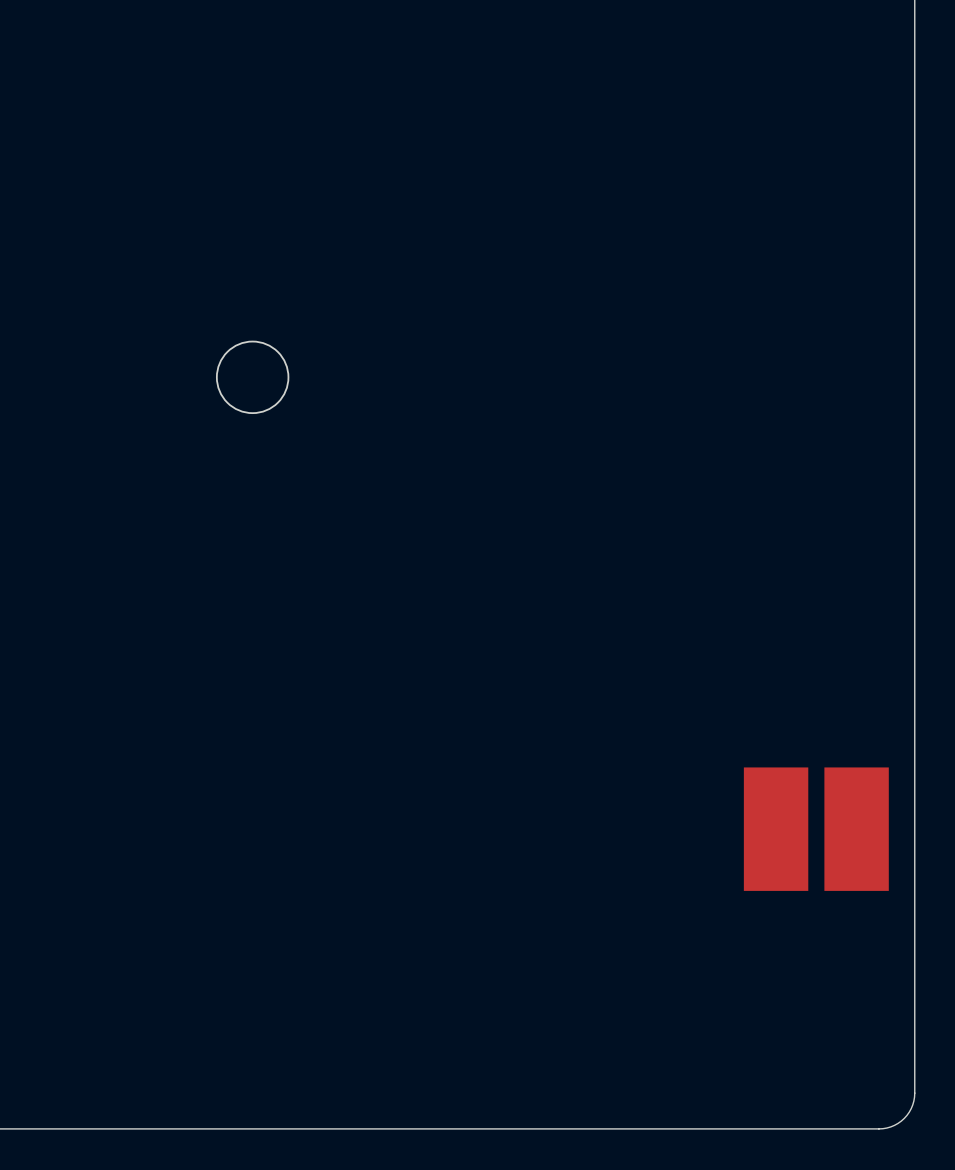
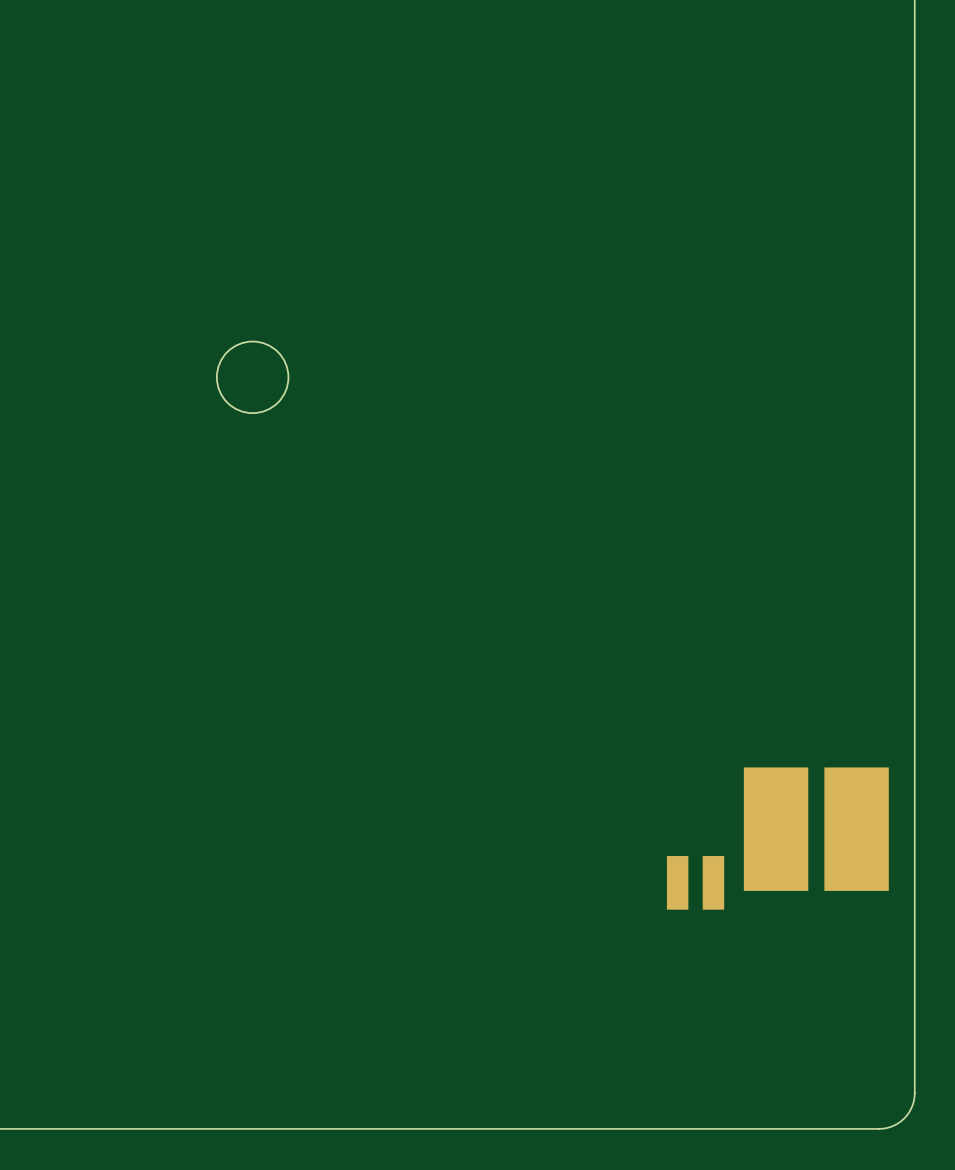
part: none -> (677, 882)
part: none -> (713, 882)

